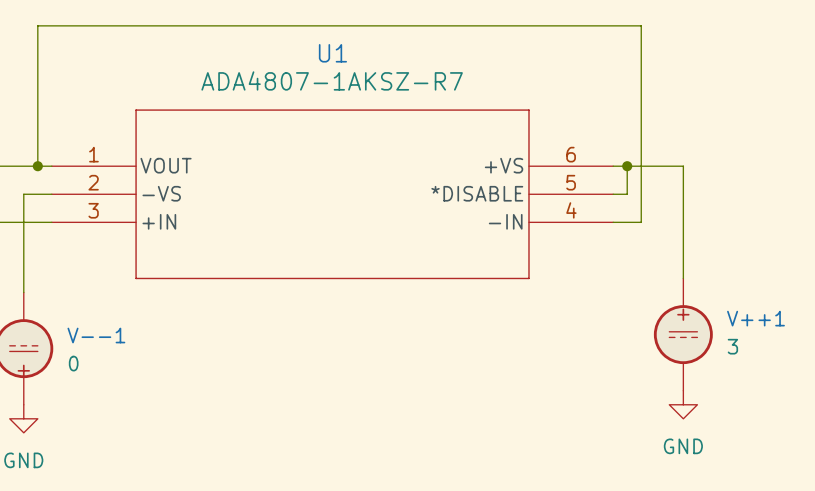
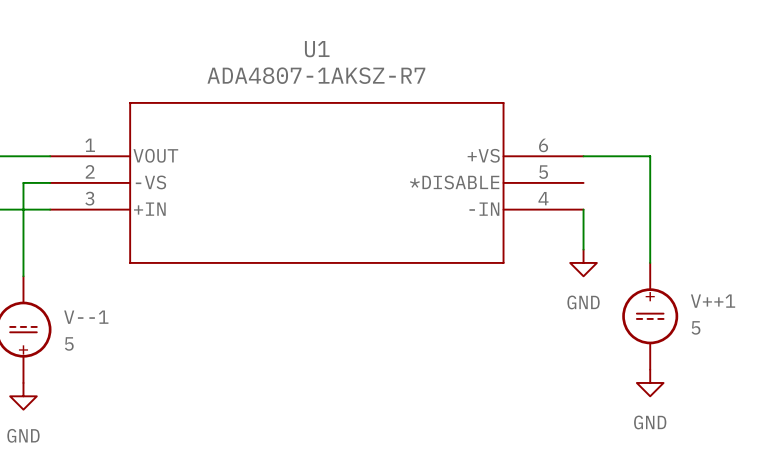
wire: (37, 166) (37, 25) (641, 25) (641, 222) (613, 222) -> (583, 249) (583, 209)
junction: (37, 166) -> none
wire: (627, 166) (627, 194) (613, 194) -> none
junction: (627, 166) -> none
power symbol: none -> GND (583, 262)
V++1 value: 3 (732, 346) -> 5 (696, 327)
V--1 value: 0 (73, 363) -> 5 (69, 343)

